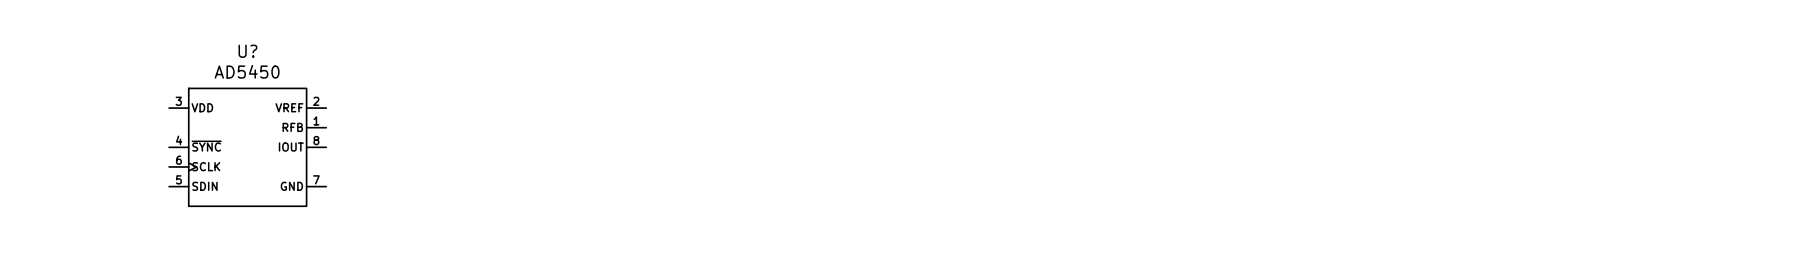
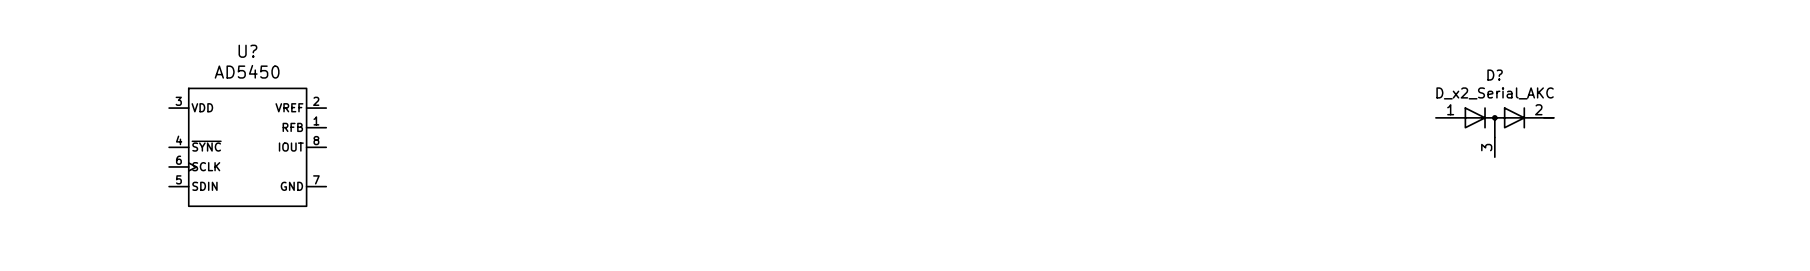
D?: none -> D_x2_Serial_AKC (1494, 132)

